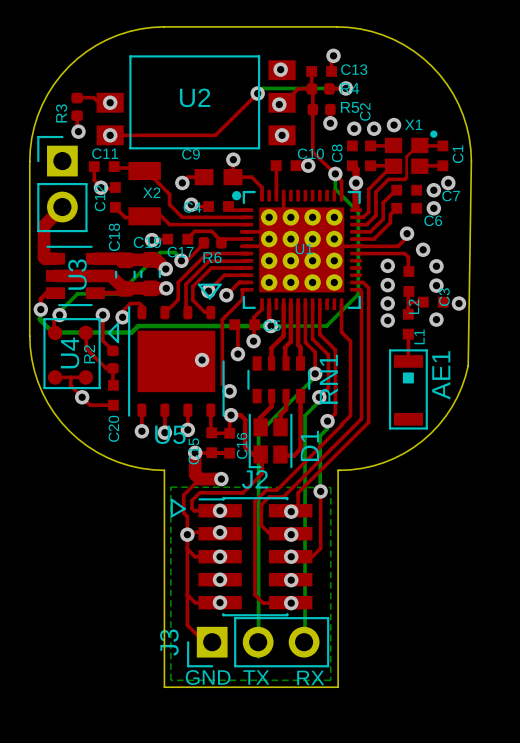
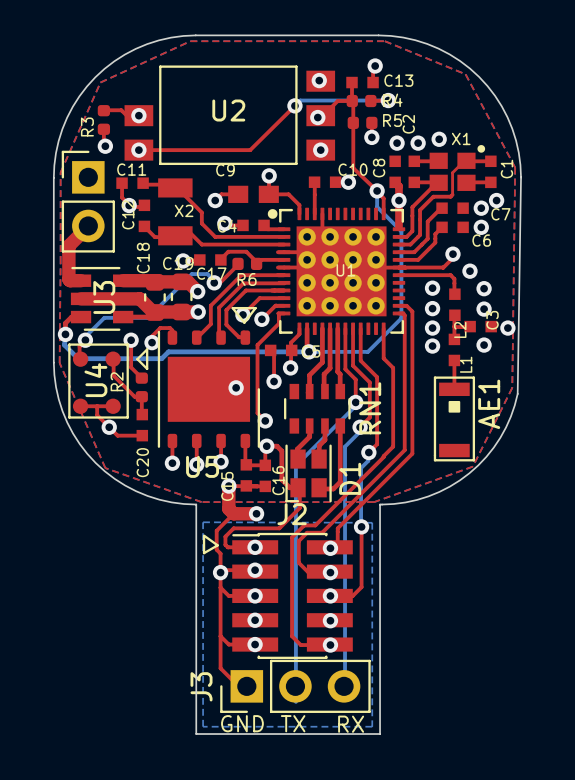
top zone outline: none -> (190, 41) (100, 82) (60, 172) (59, 363) (105, 468) (201, 502) (374, 502) (472, 466) (512, 387) (515, 167) (465, 74) (384, 41) (190, 41)

